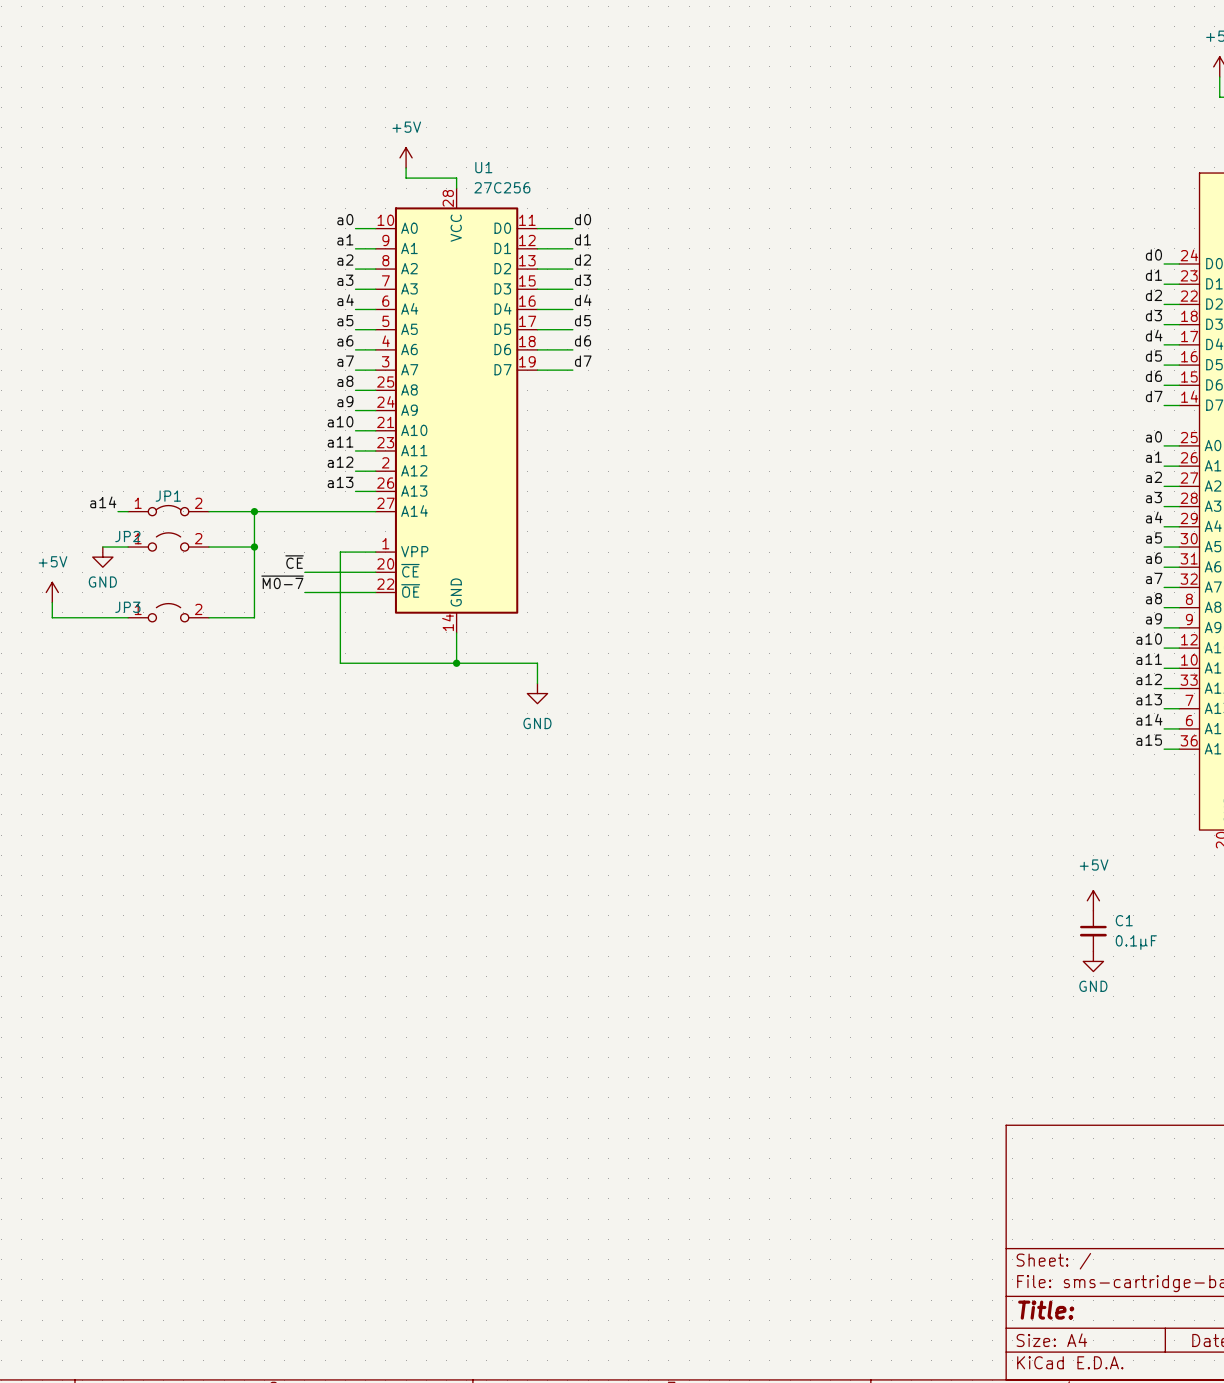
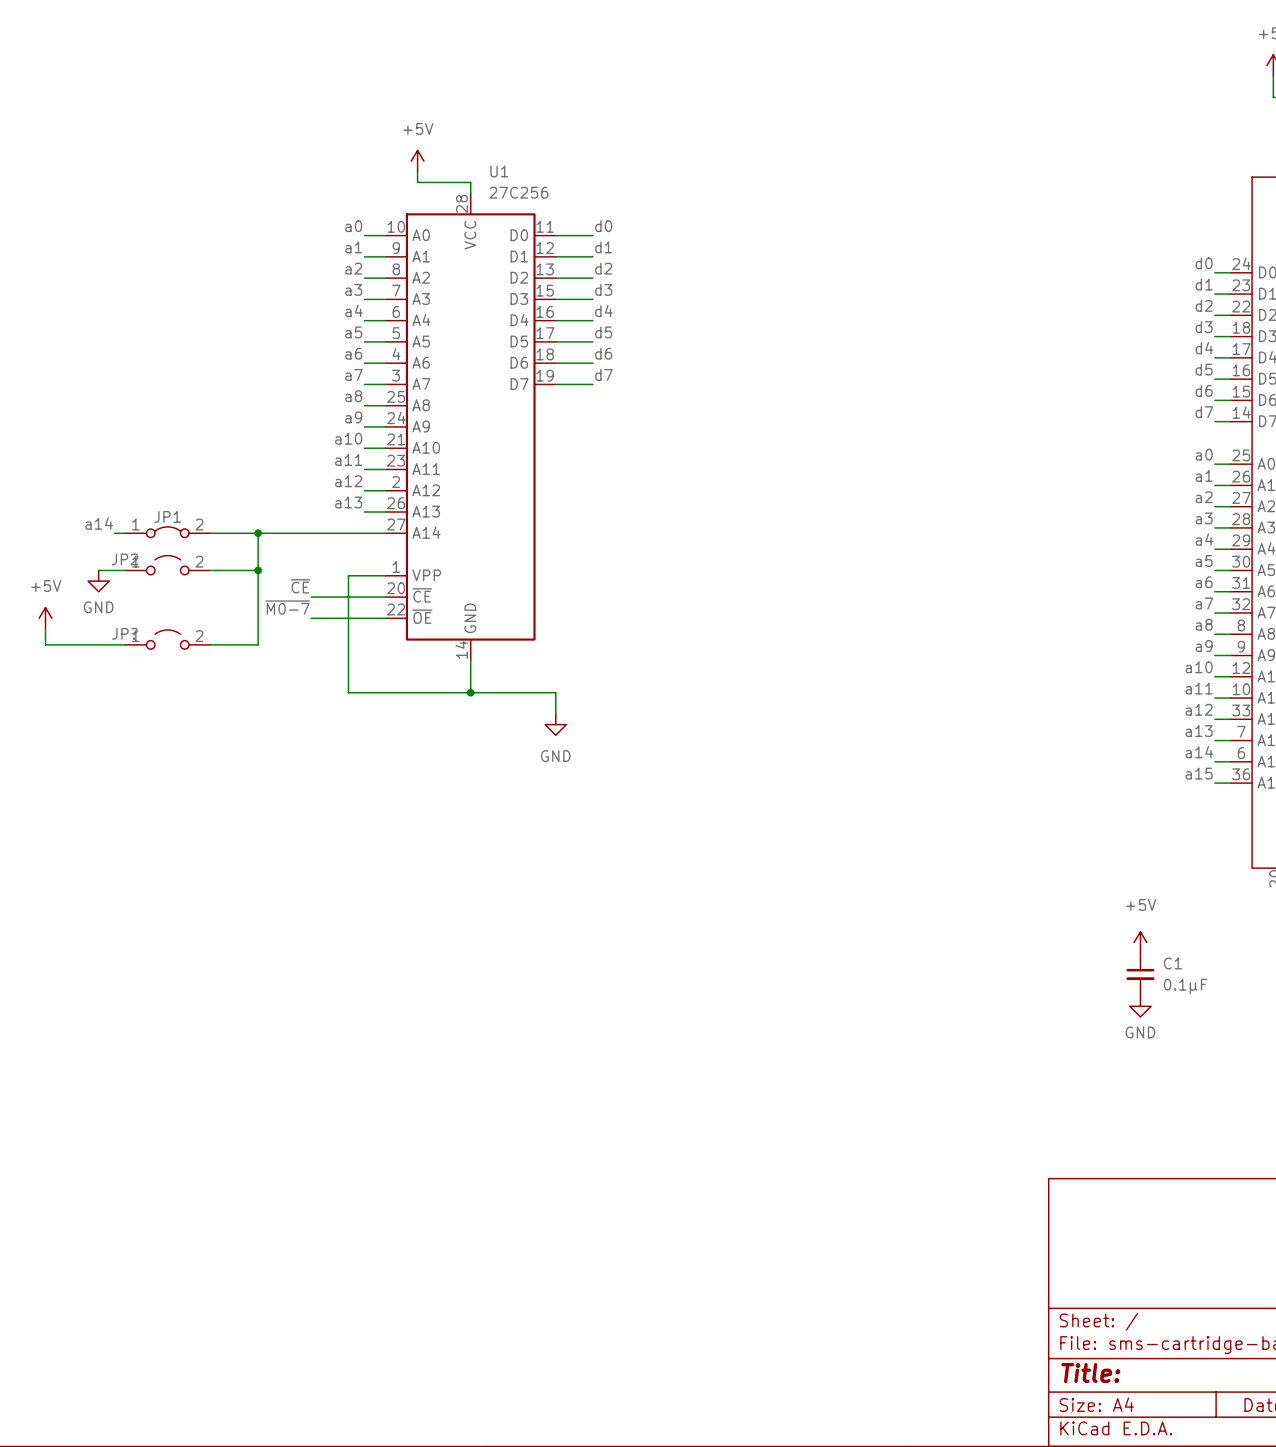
JP3 name: JP3 (127, 607) -> JP? (124, 633)

